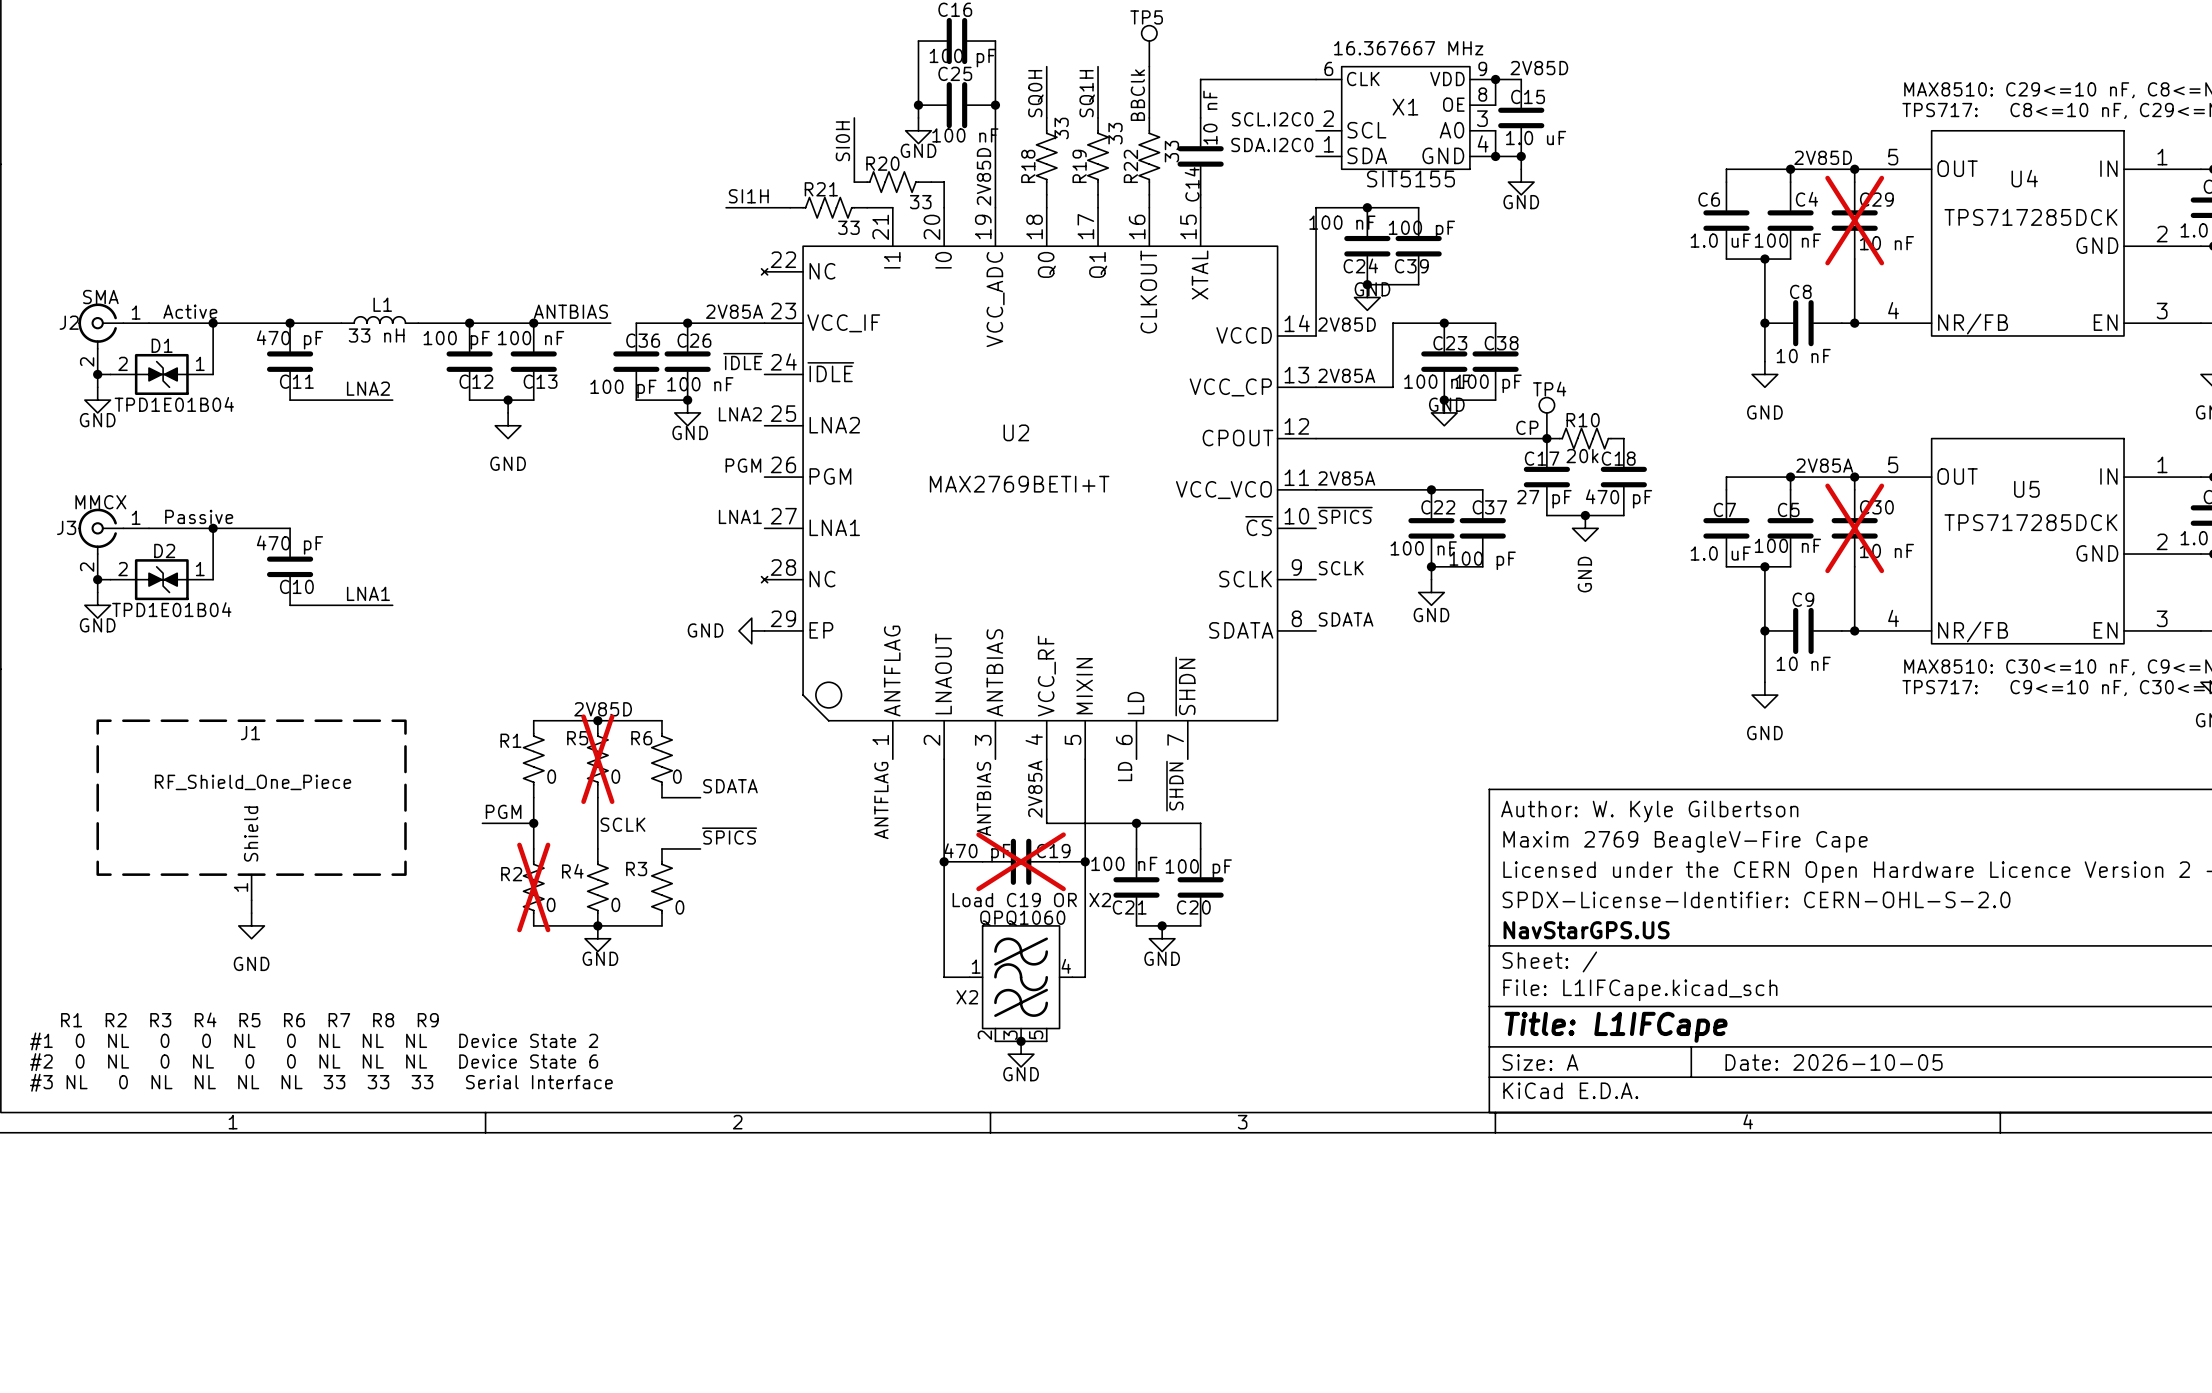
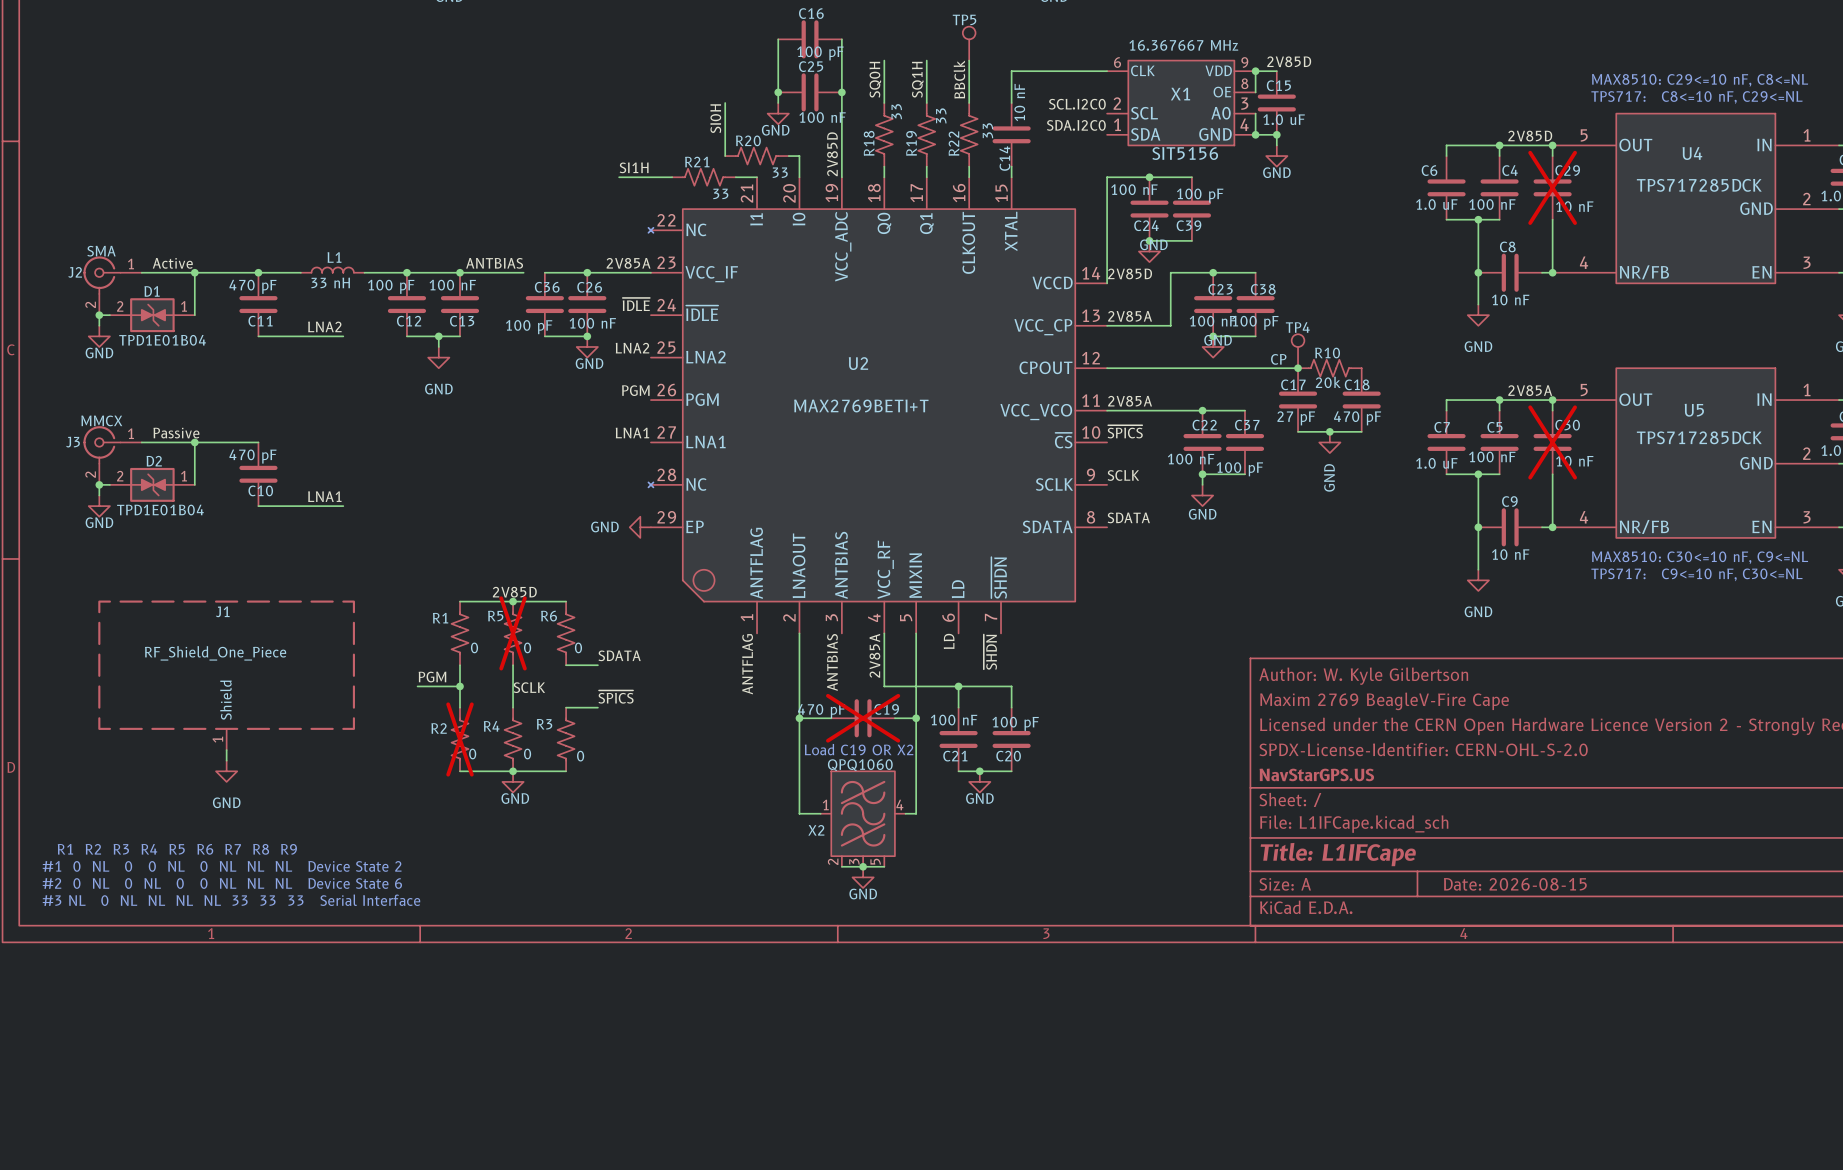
X1 value: SIT5155 (1410, 178) -> SIT5156 (1185, 153)
title block: Date: 2026-10-05 (1834, 1062) -> Date: 2026-08-15 (1515, 884)

